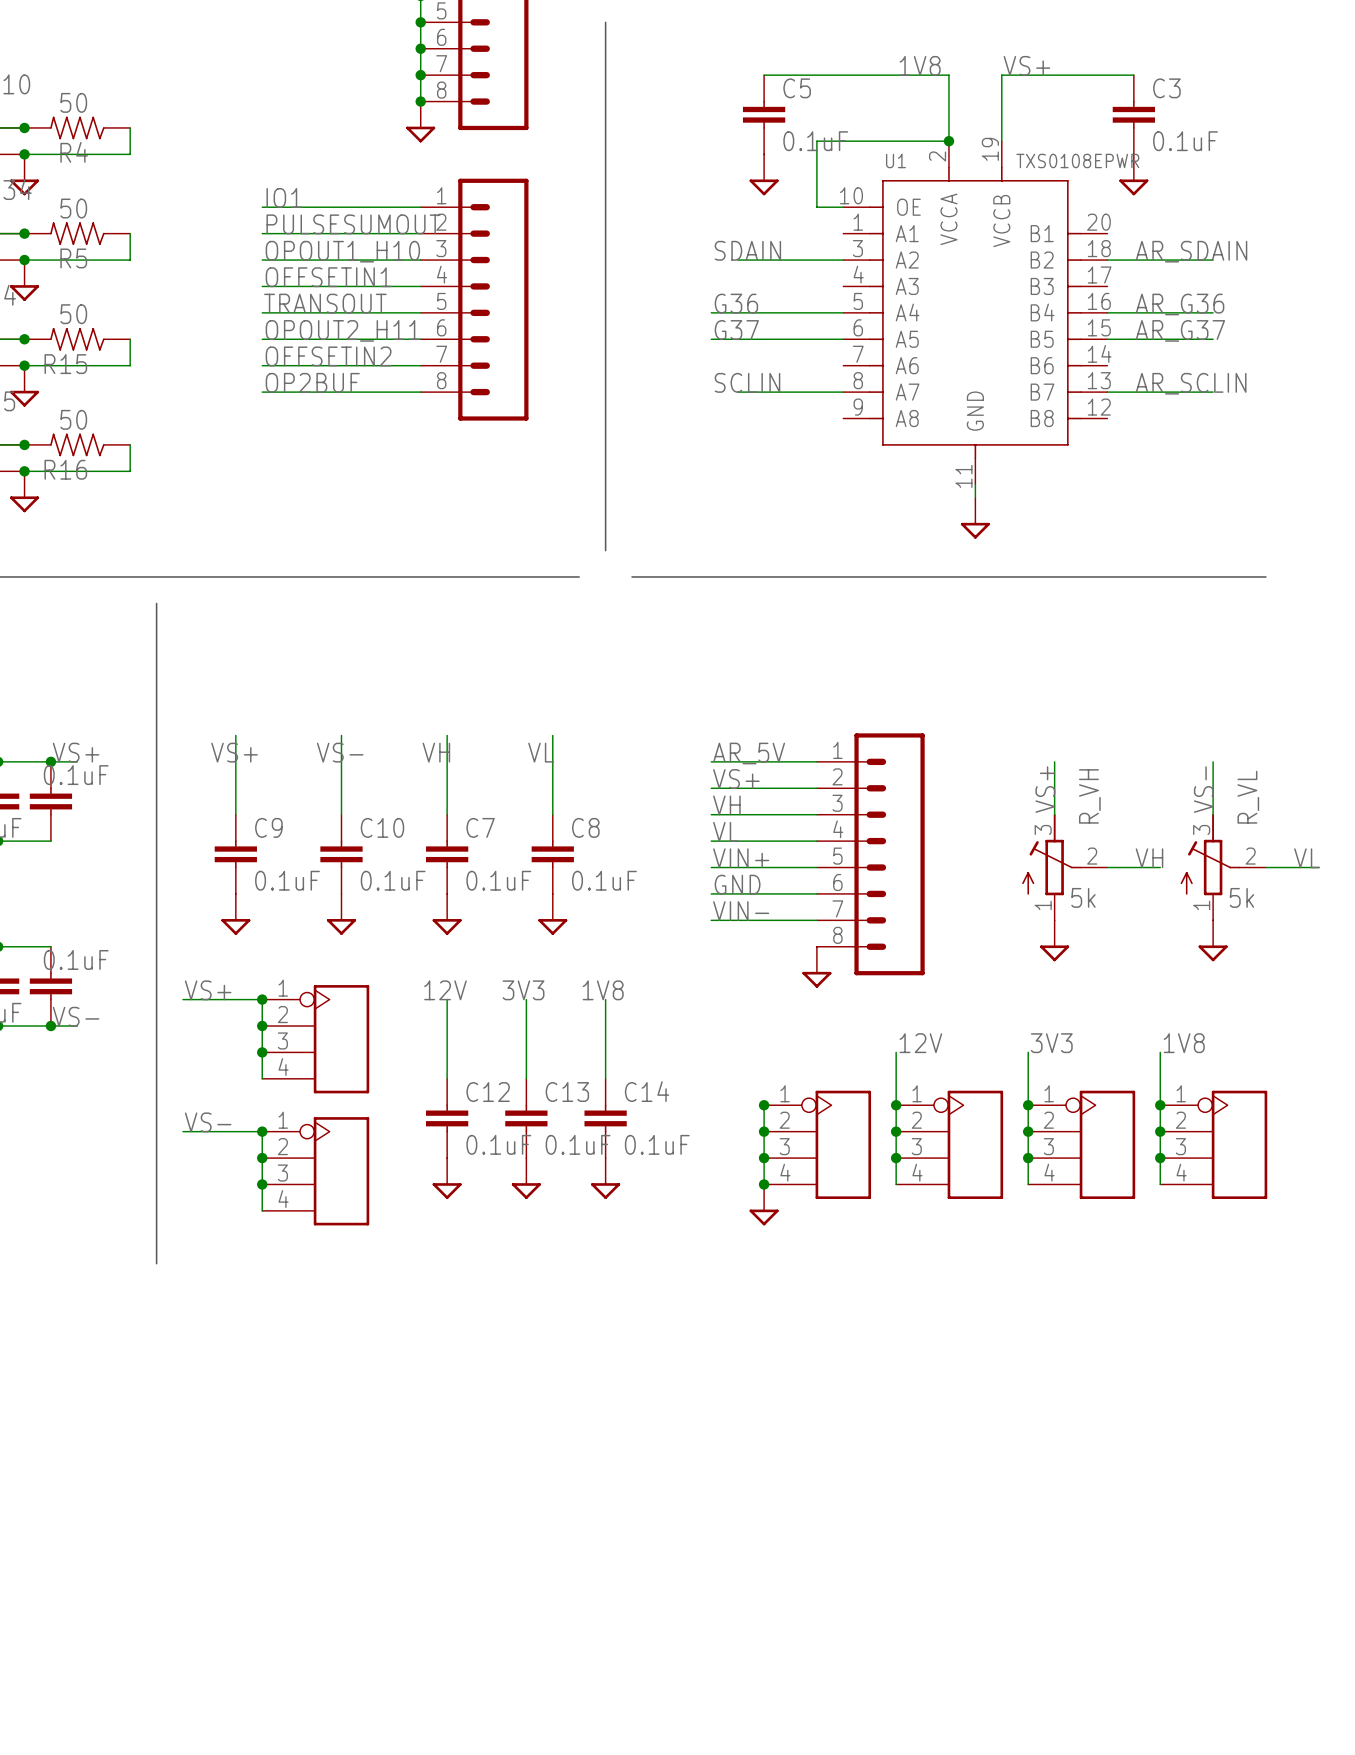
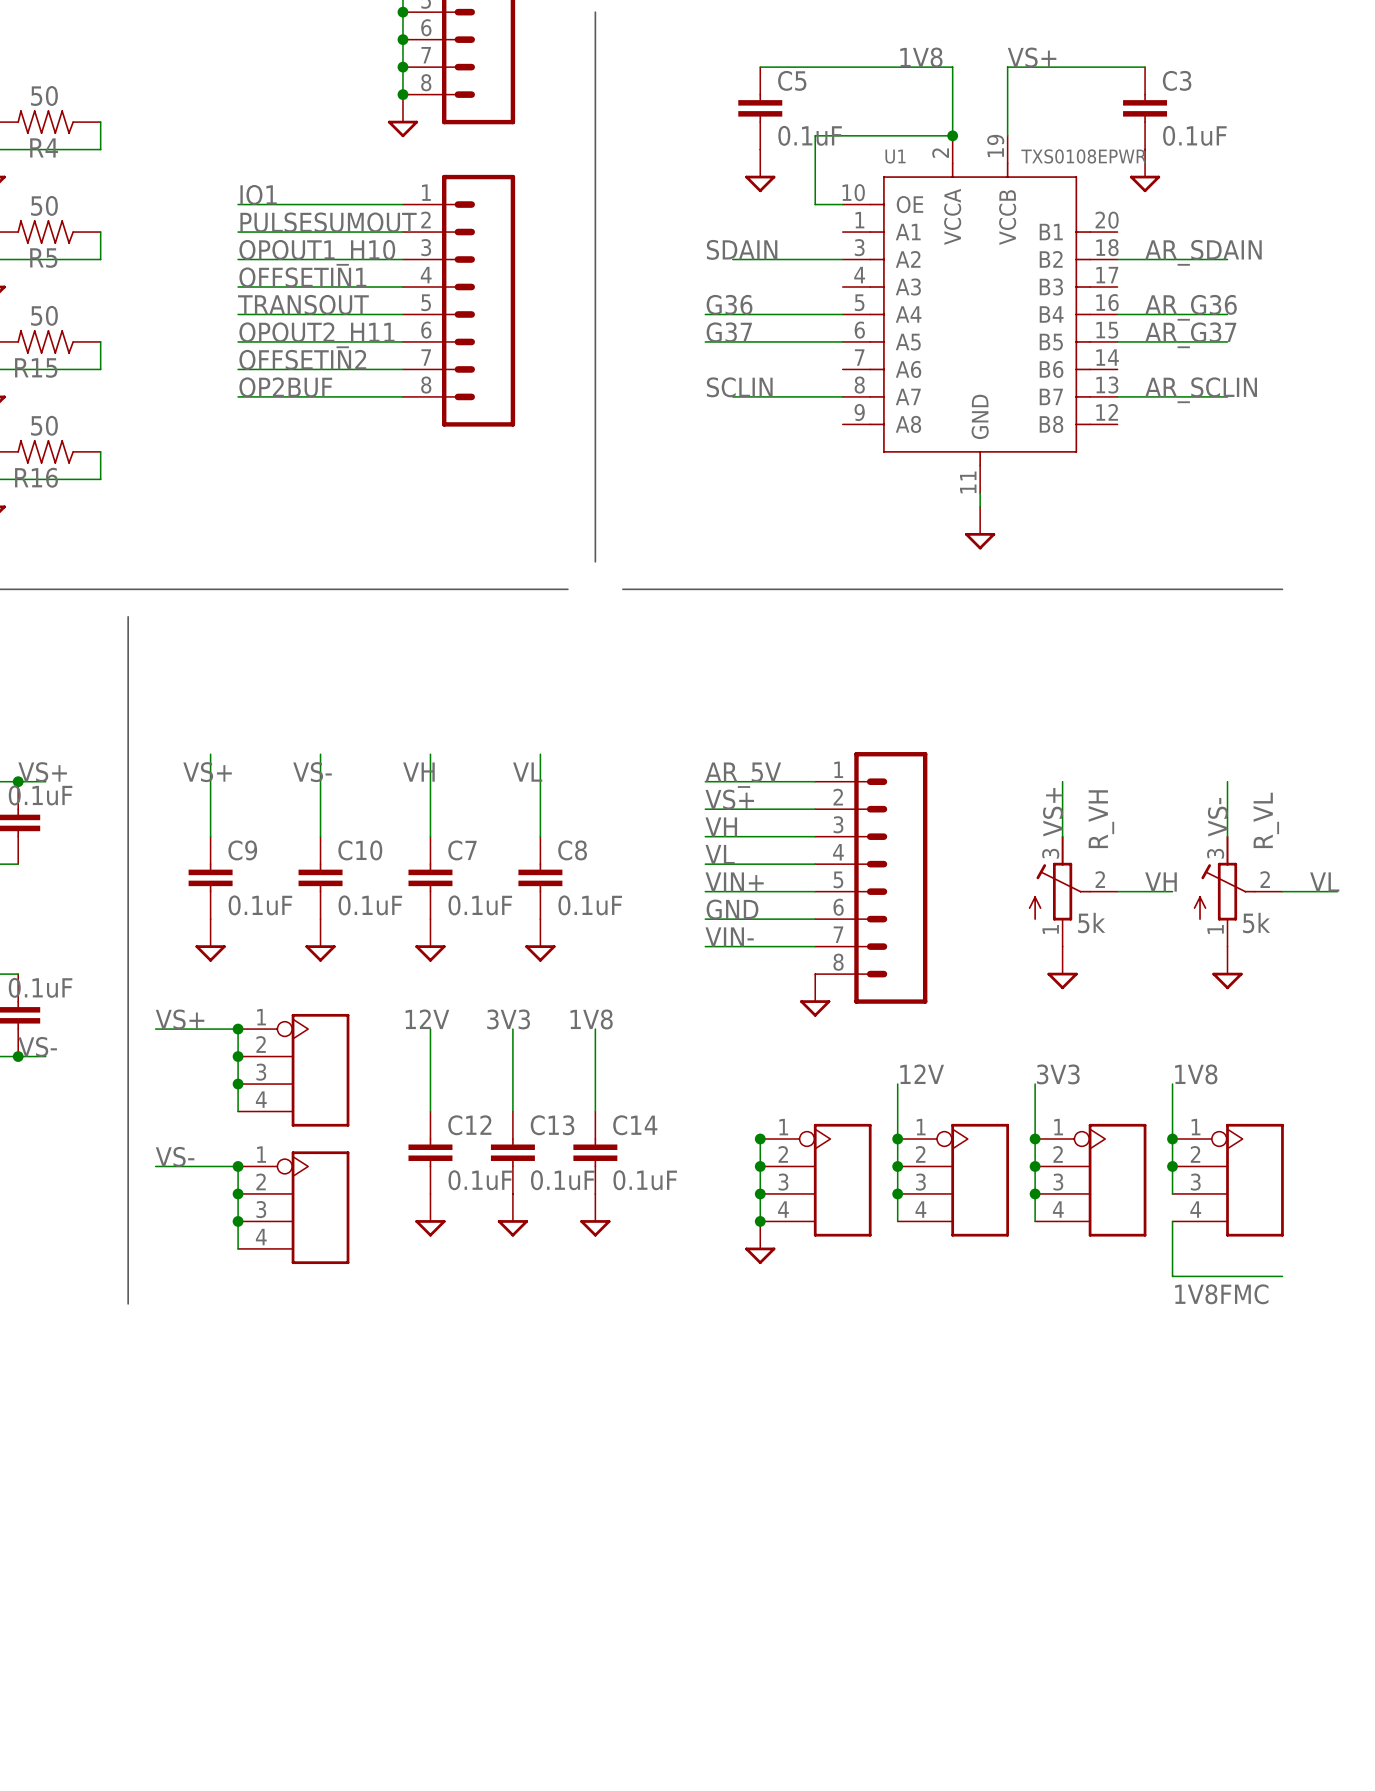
wire: (1160, 1158) (1160, 1184) -> (1282, 1276) (1172, 1276) (1172, 1221)
junction: (1160, 1158) -> none
label: none -> 1V8FMC (1221, 1294)

